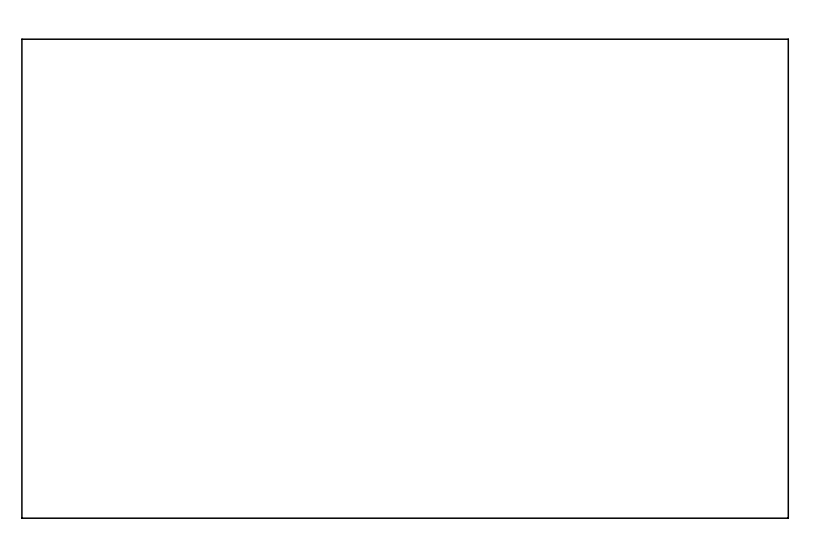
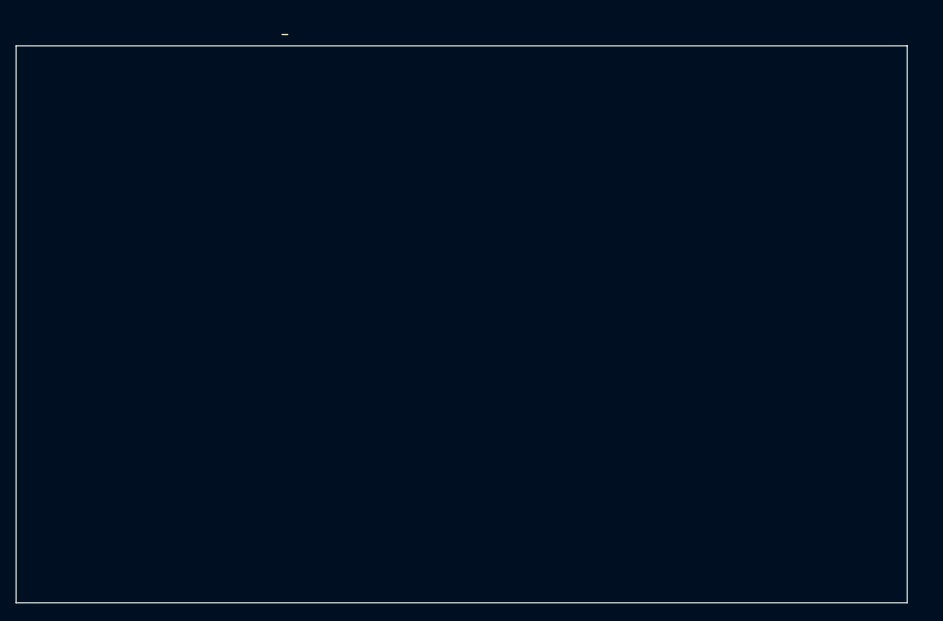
line: none -> (282, 34) (287, 34)

